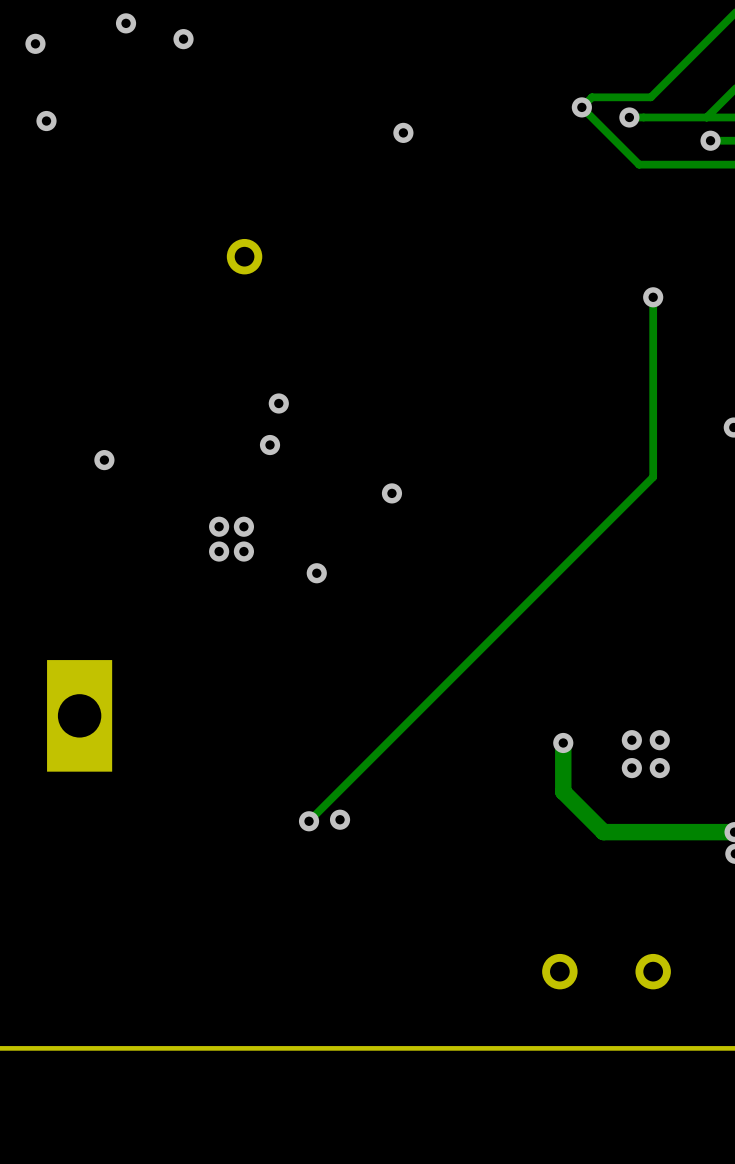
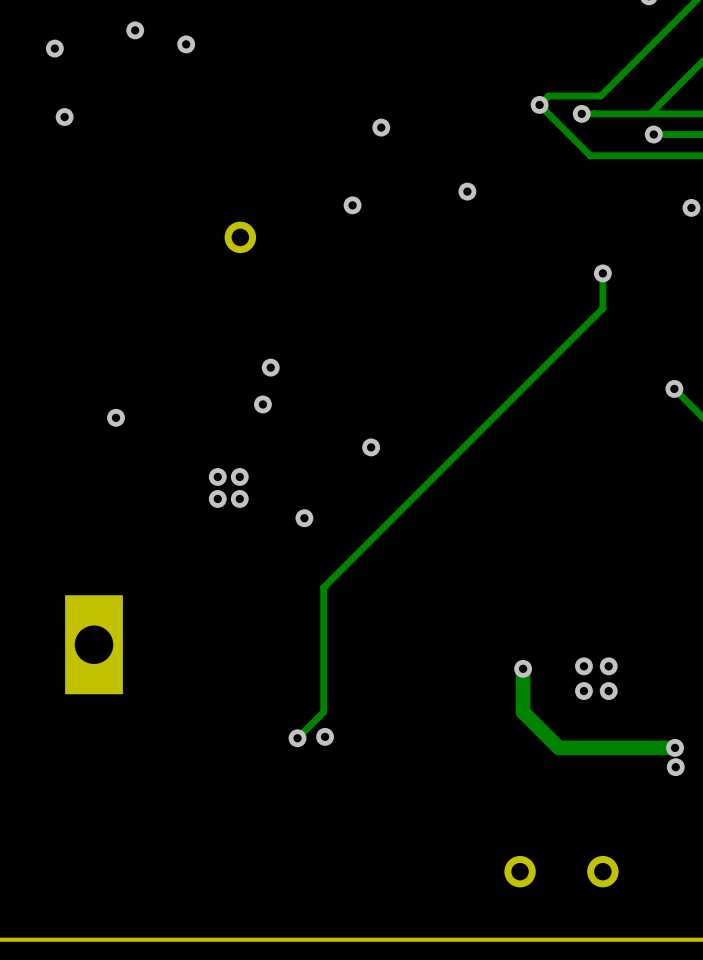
via: none -> (467, 191)
via: none -> (352, 205)
track: (653, 336) (653, 477) (338, 791) -> (602, 308) (323, 587) (323, 712)

